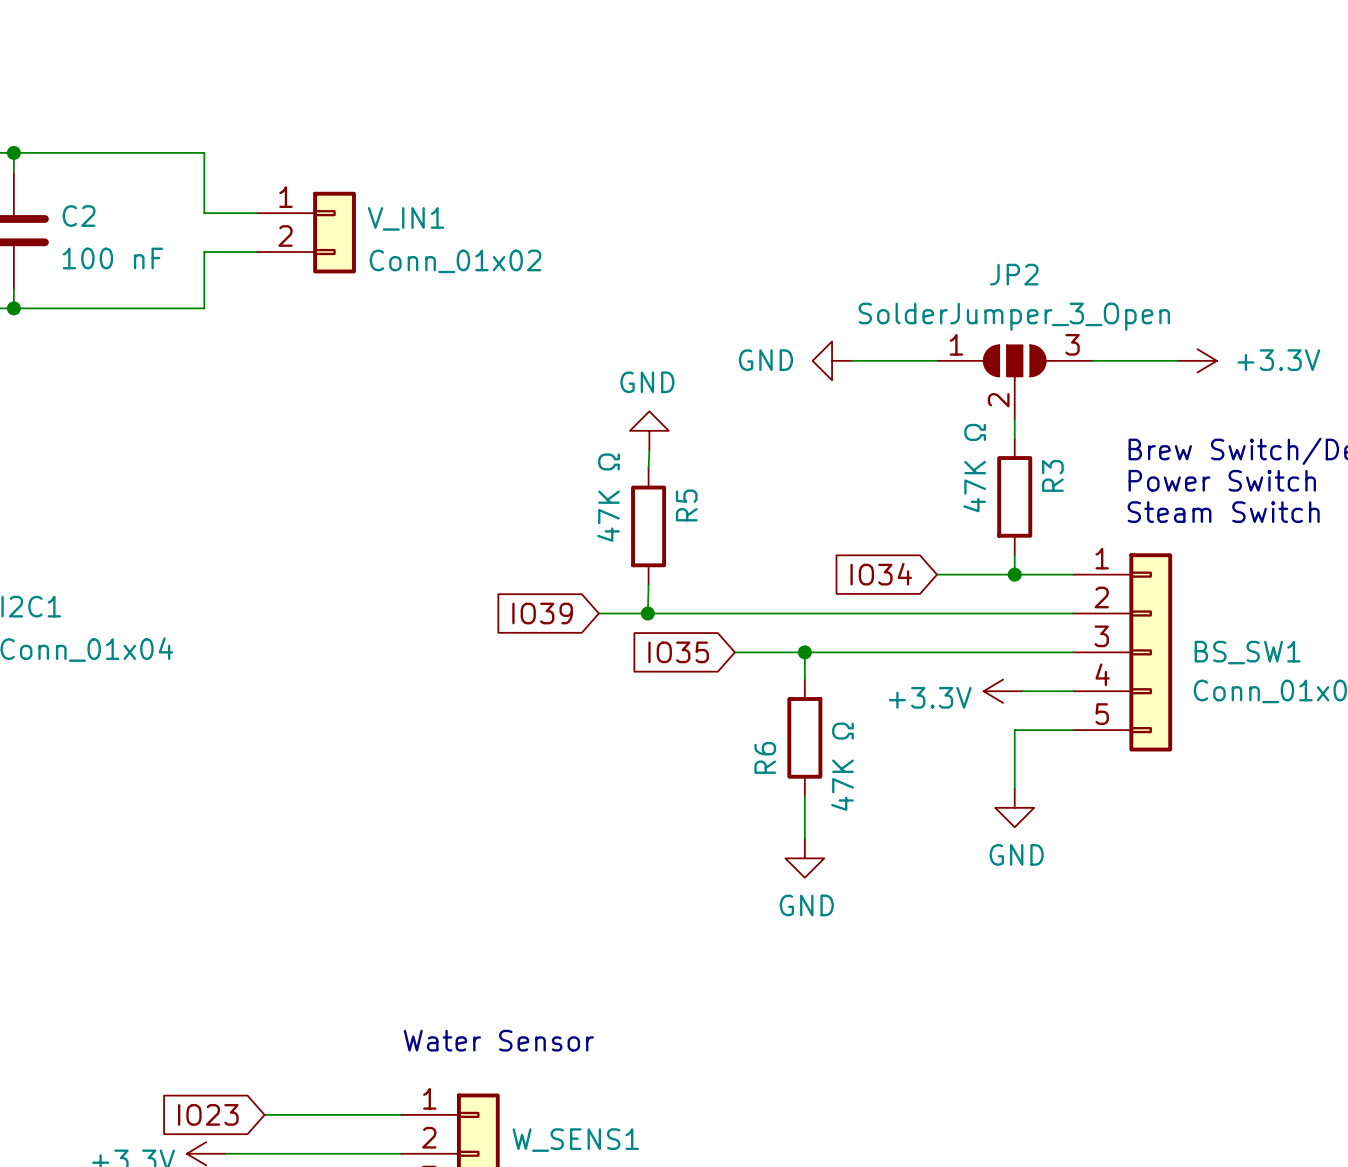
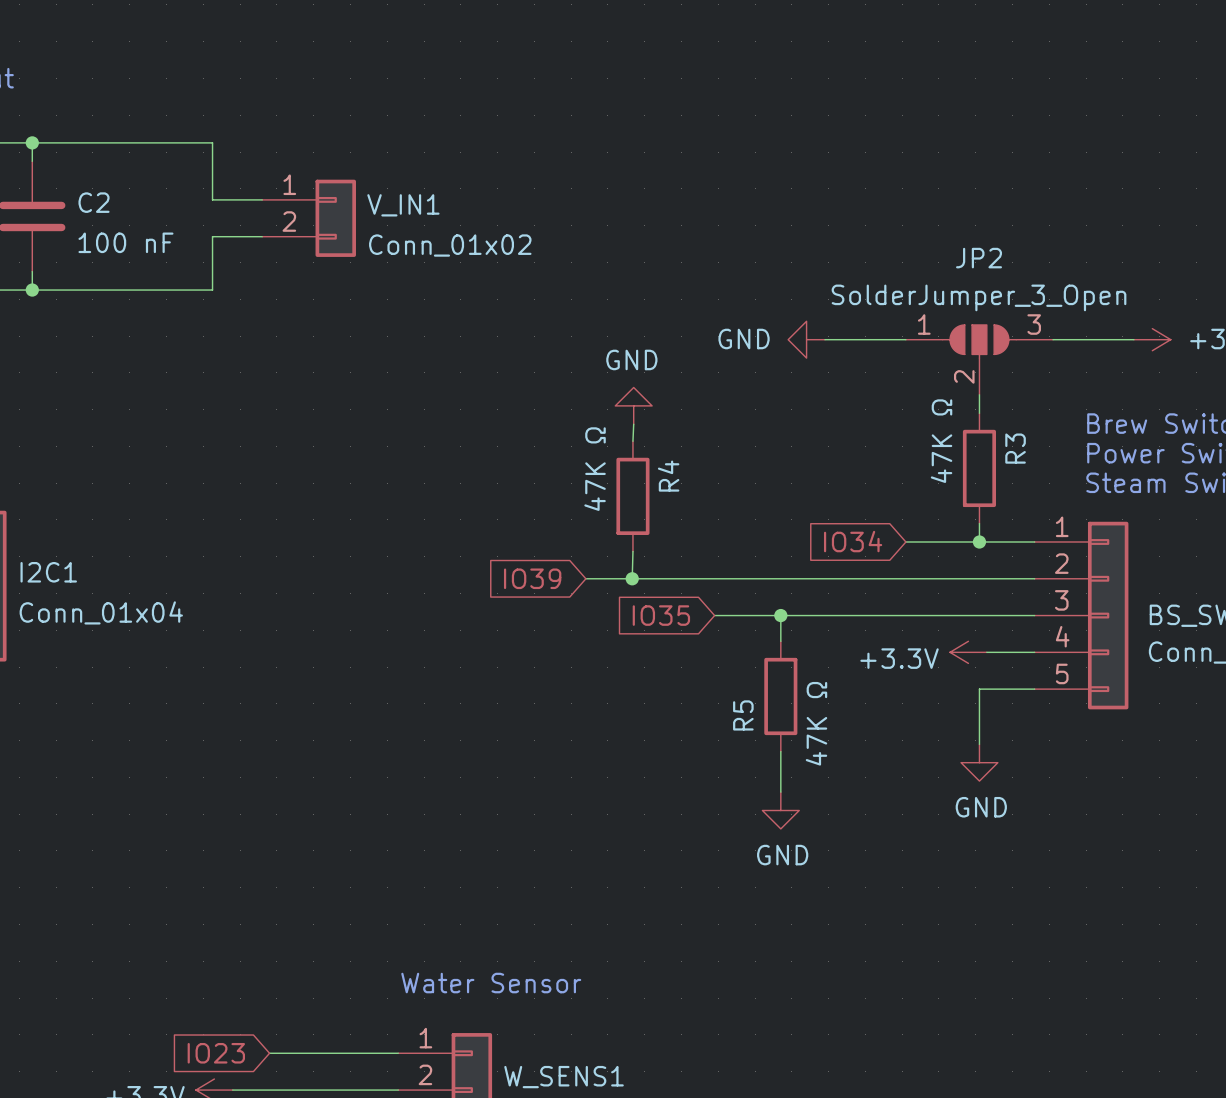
R5 name: R5 (686, 505) -> R4 (668, 476)
R6 name: R6 (765, 757) -> R5 (743, 715)

